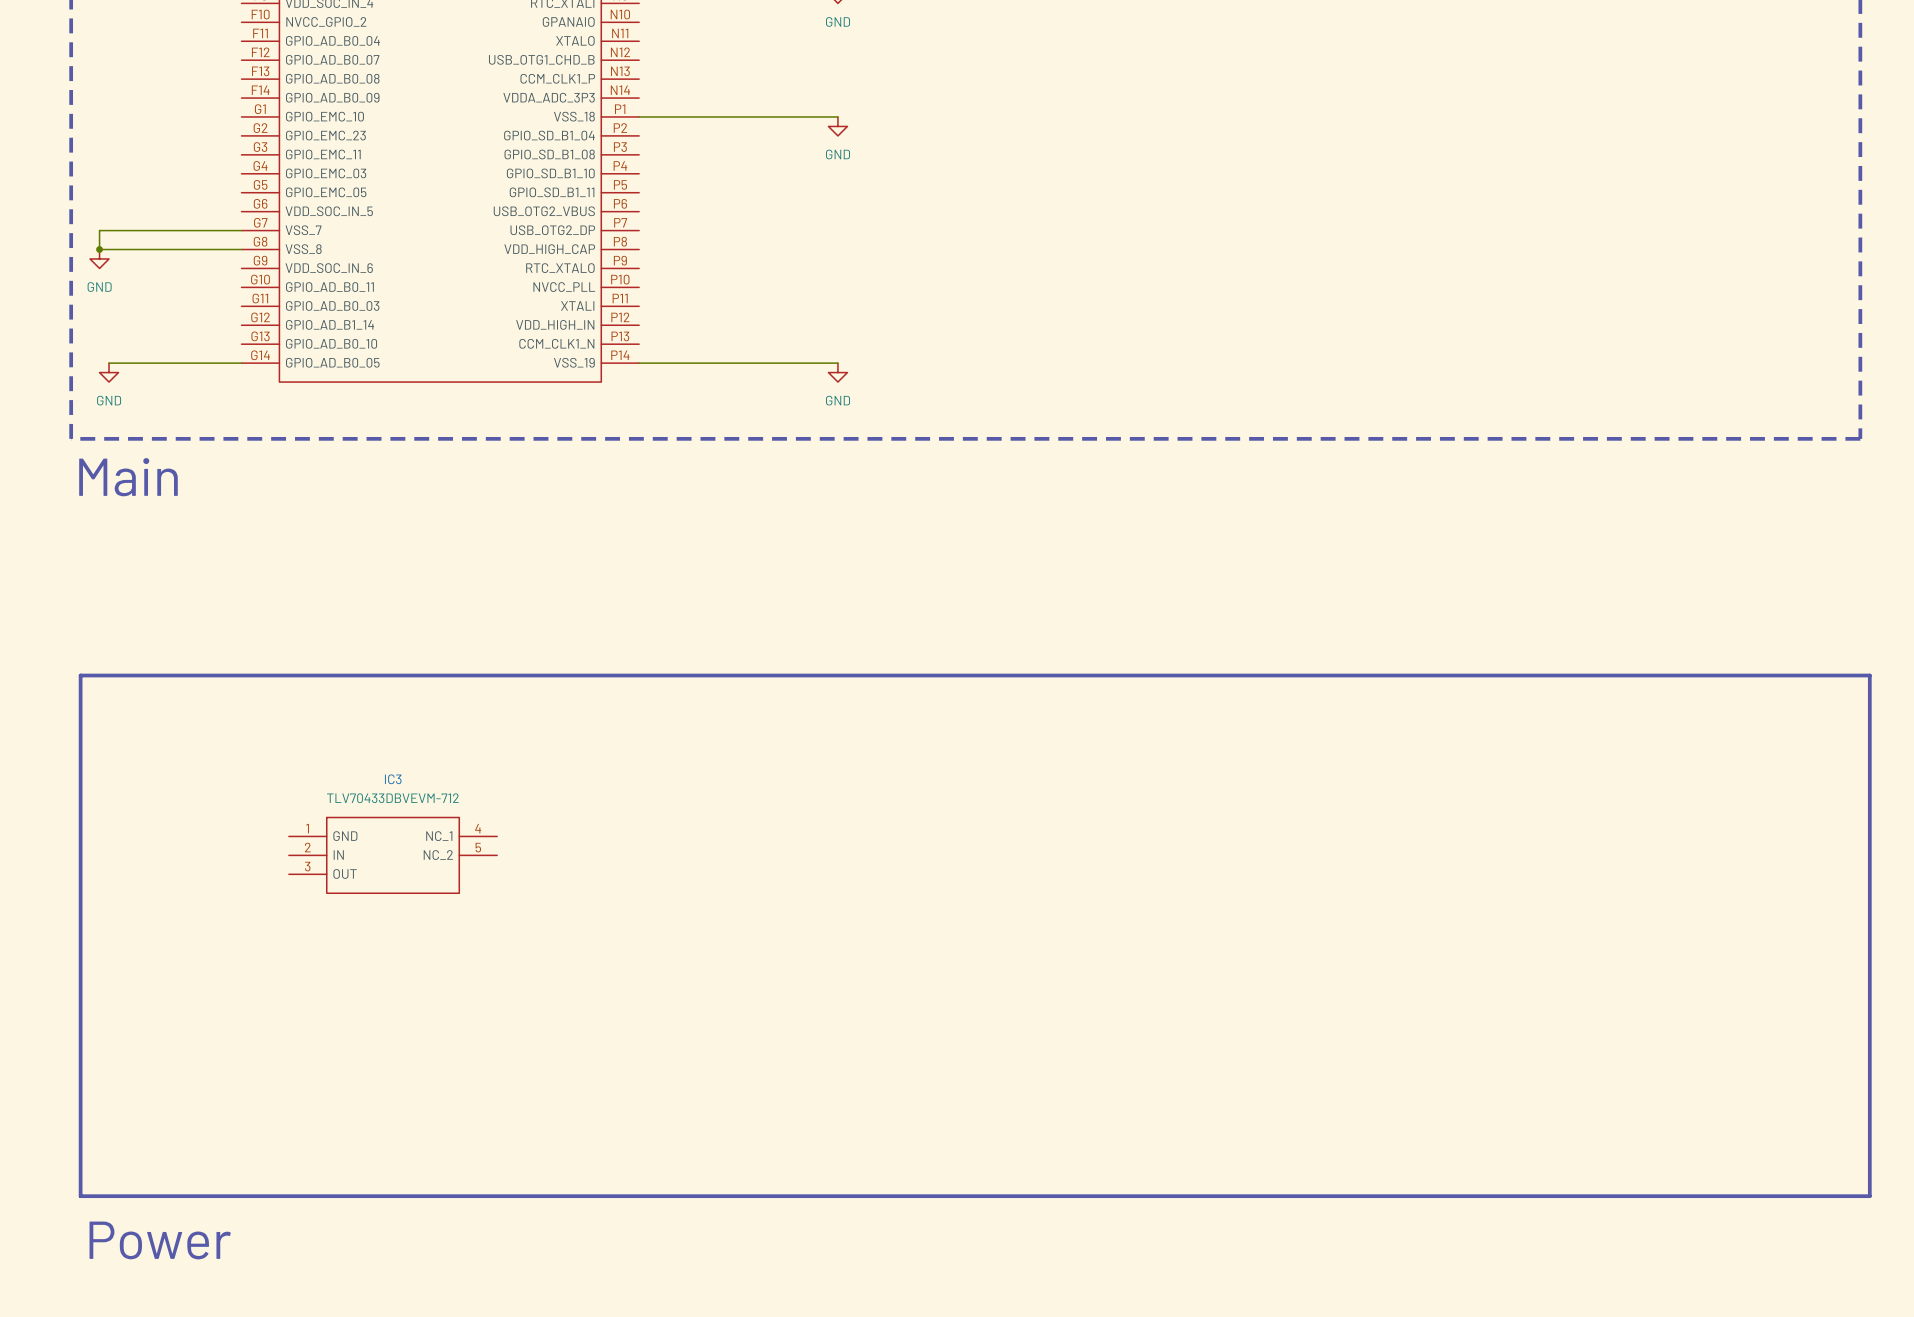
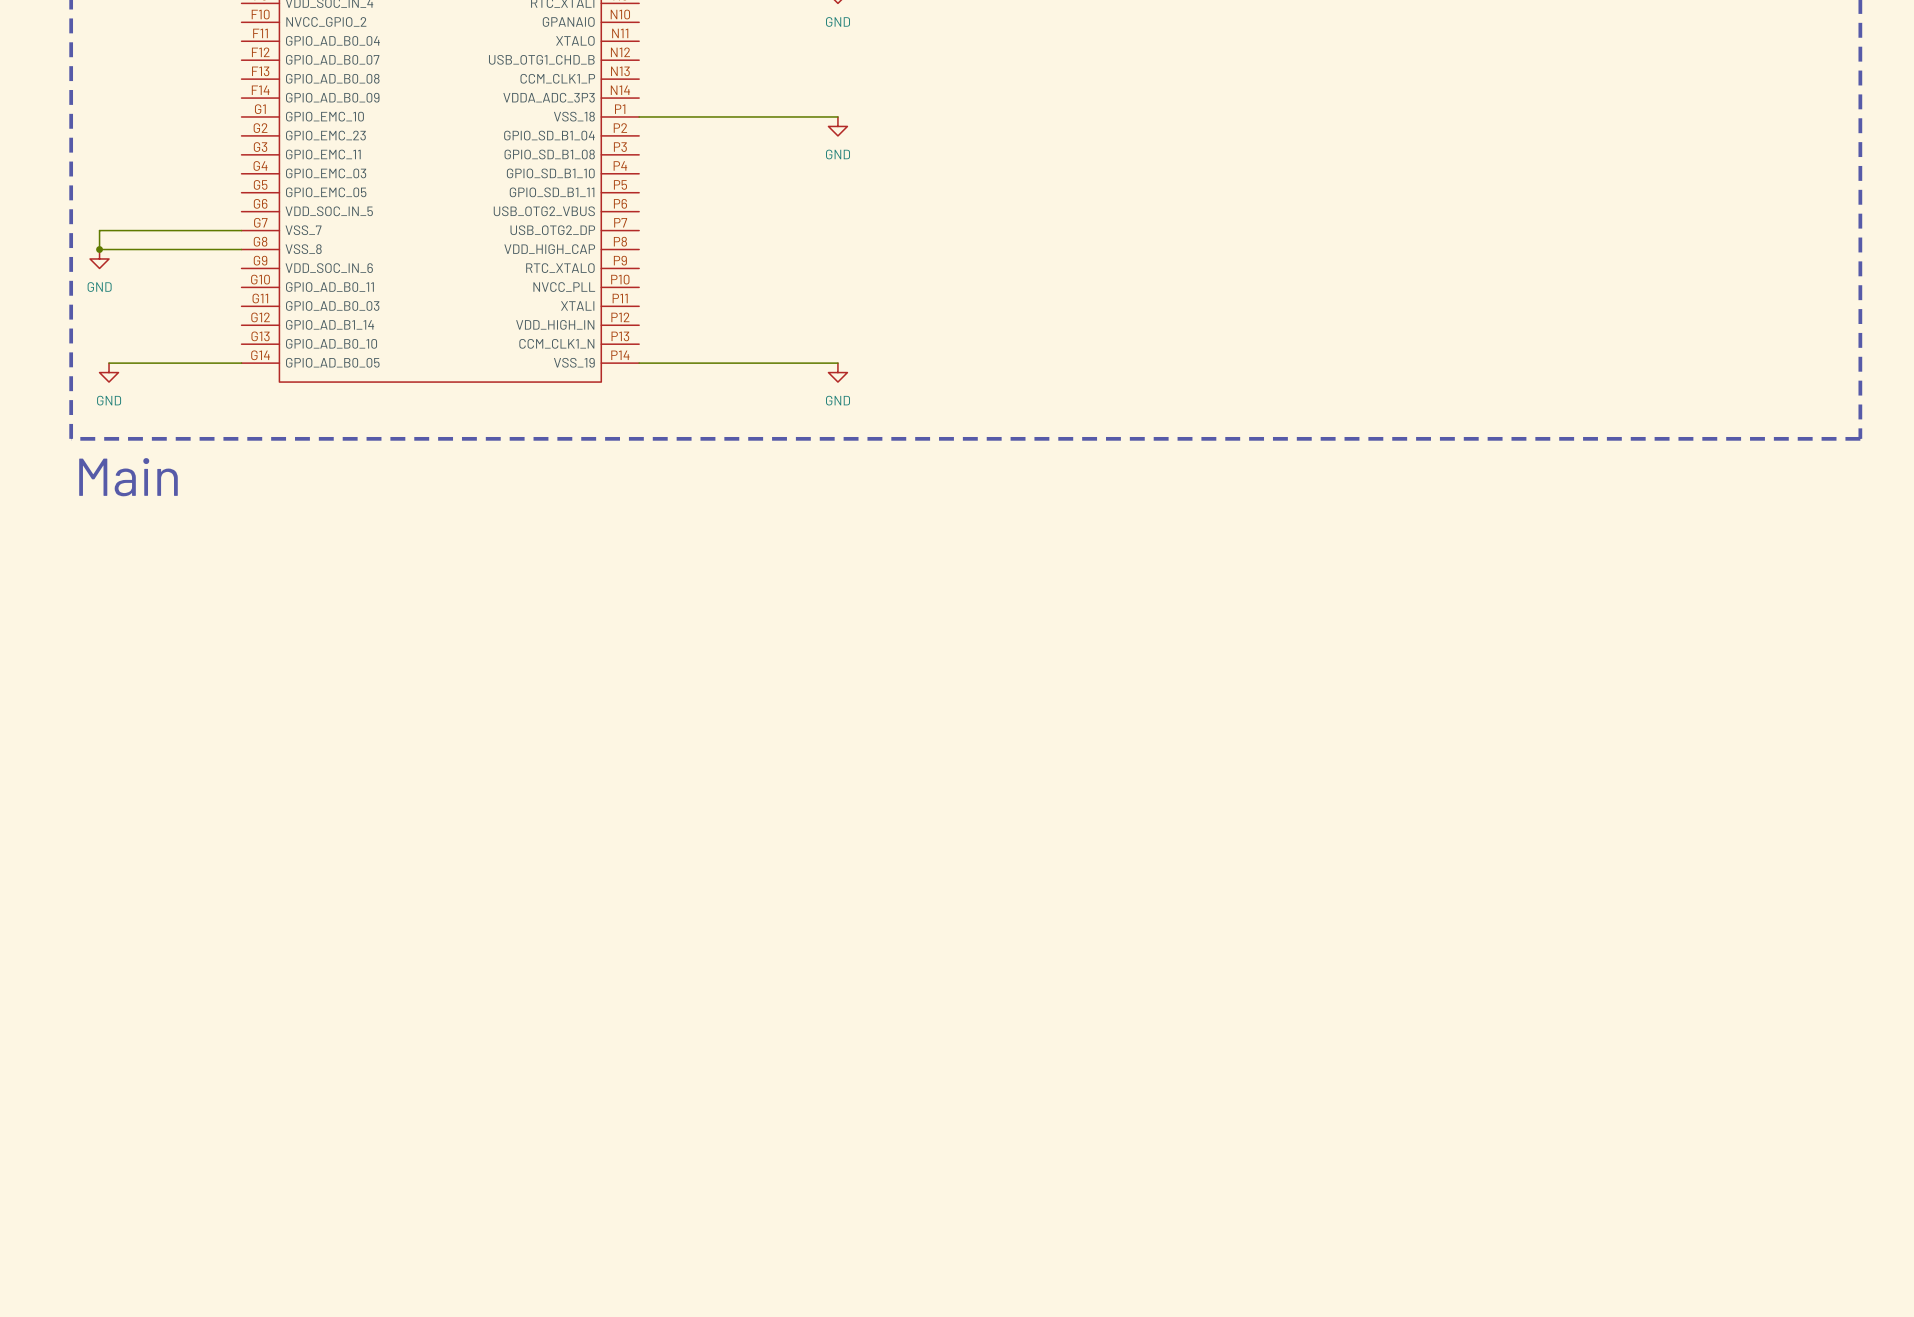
line: (80, 675) (1869, 675) (1869, 1196) (80, 1196) (80, 675) -> none
IC3: TLV70433DBVEVM-712 (393, 855) -> none
text: Power (160, 1240) -> none

